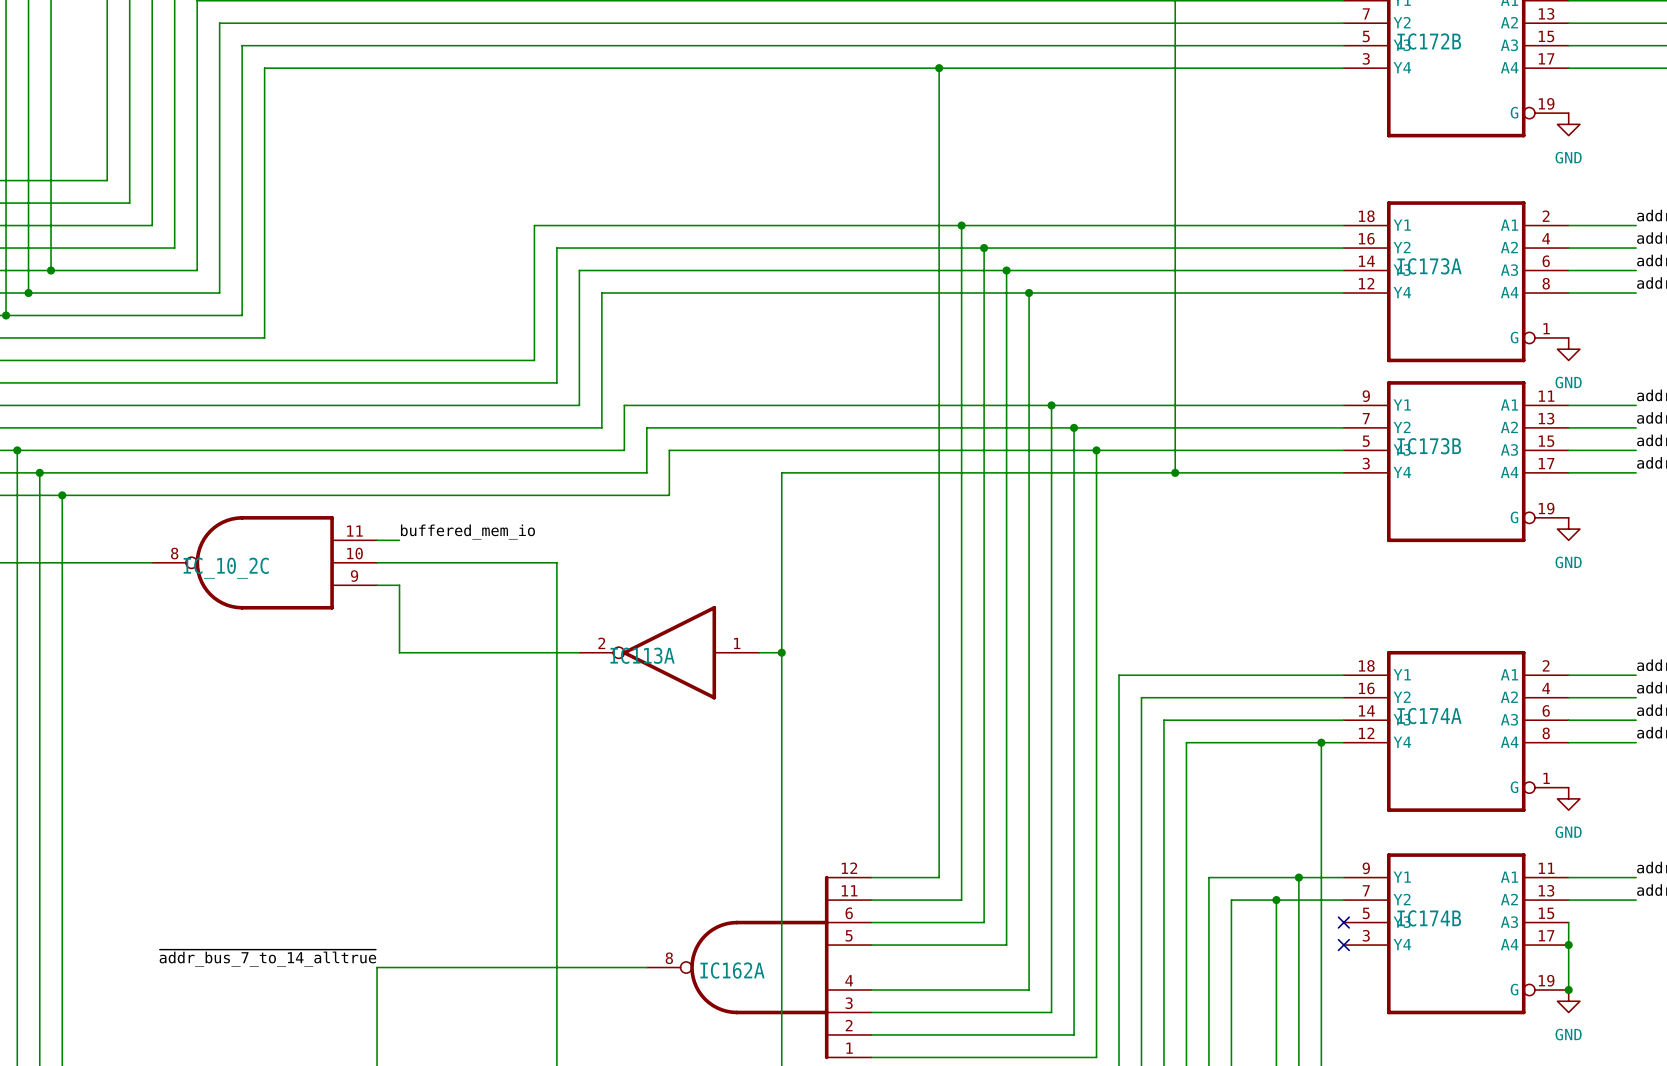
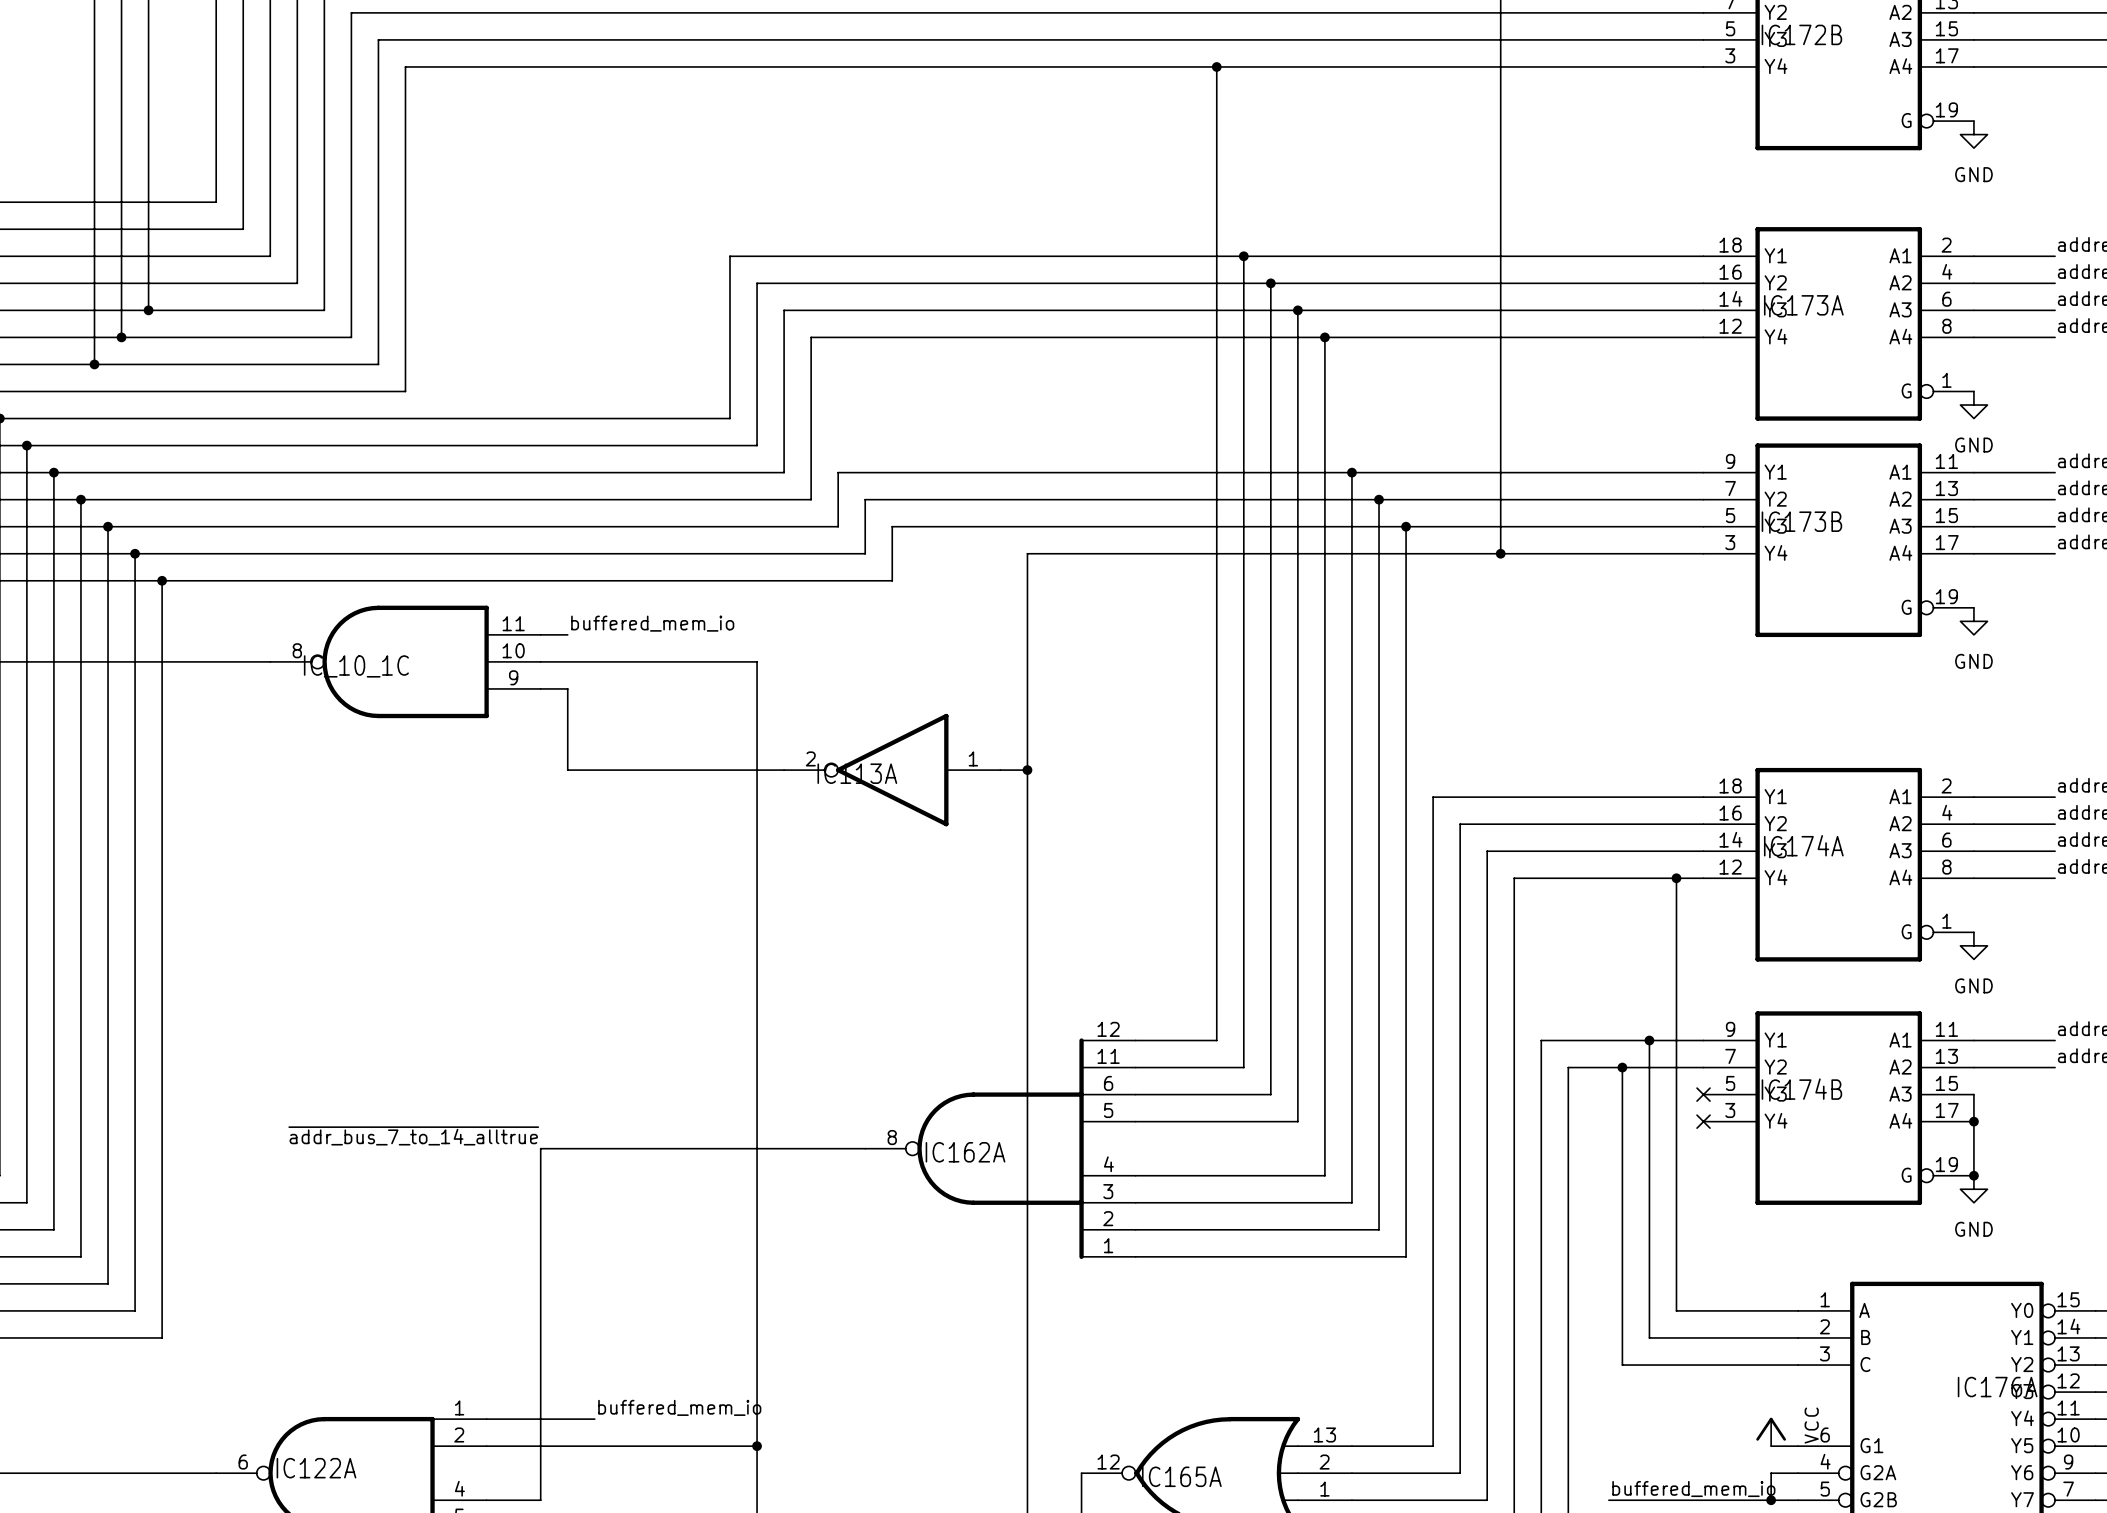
IC_10_2C name: IC_10_2C (226, 568) -> IC_10_1C (356, 666)

